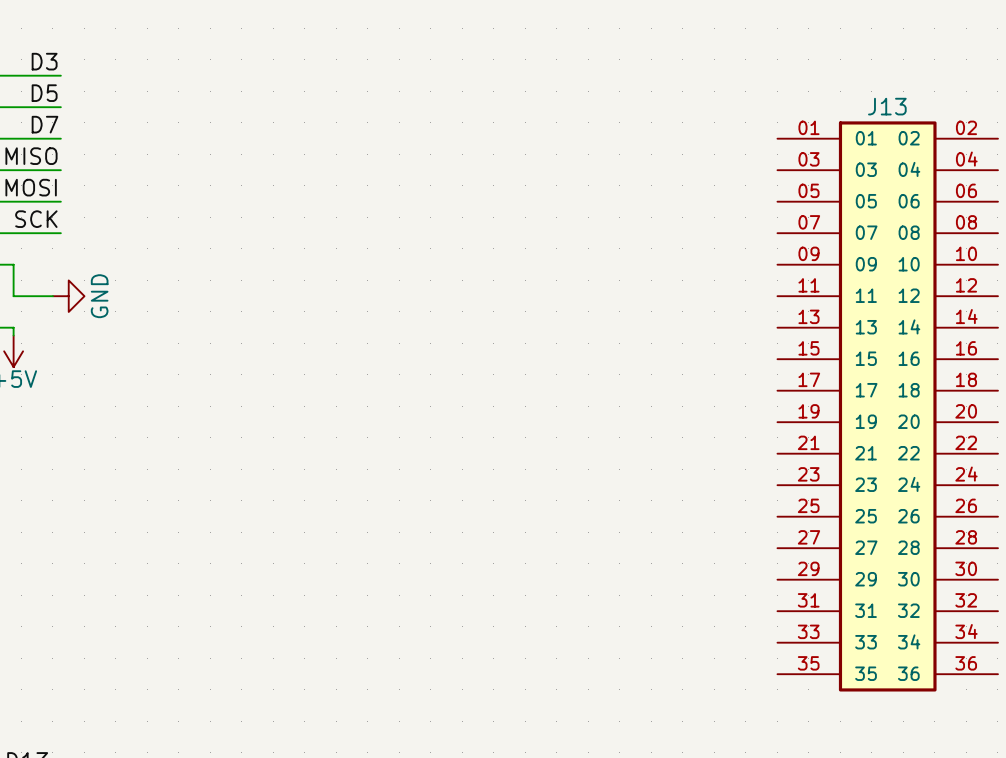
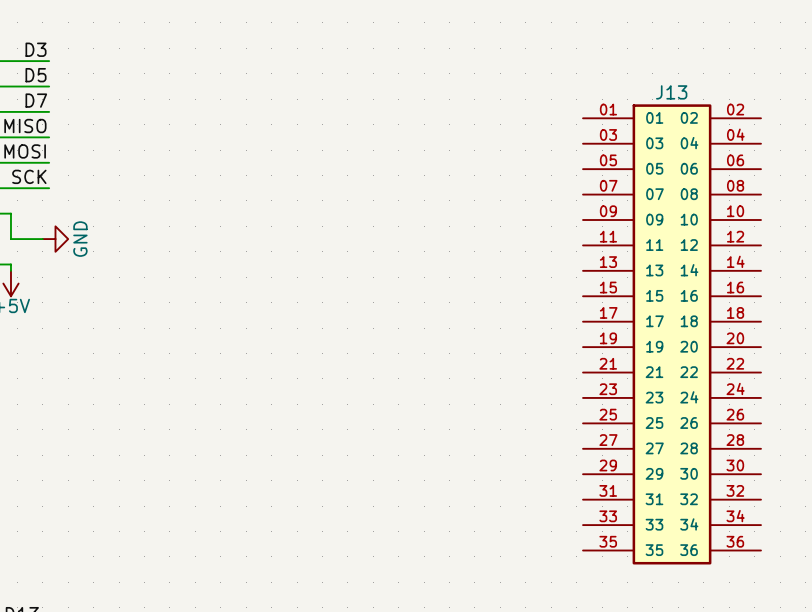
J13 position: (887, 406) -> (672, 334)

